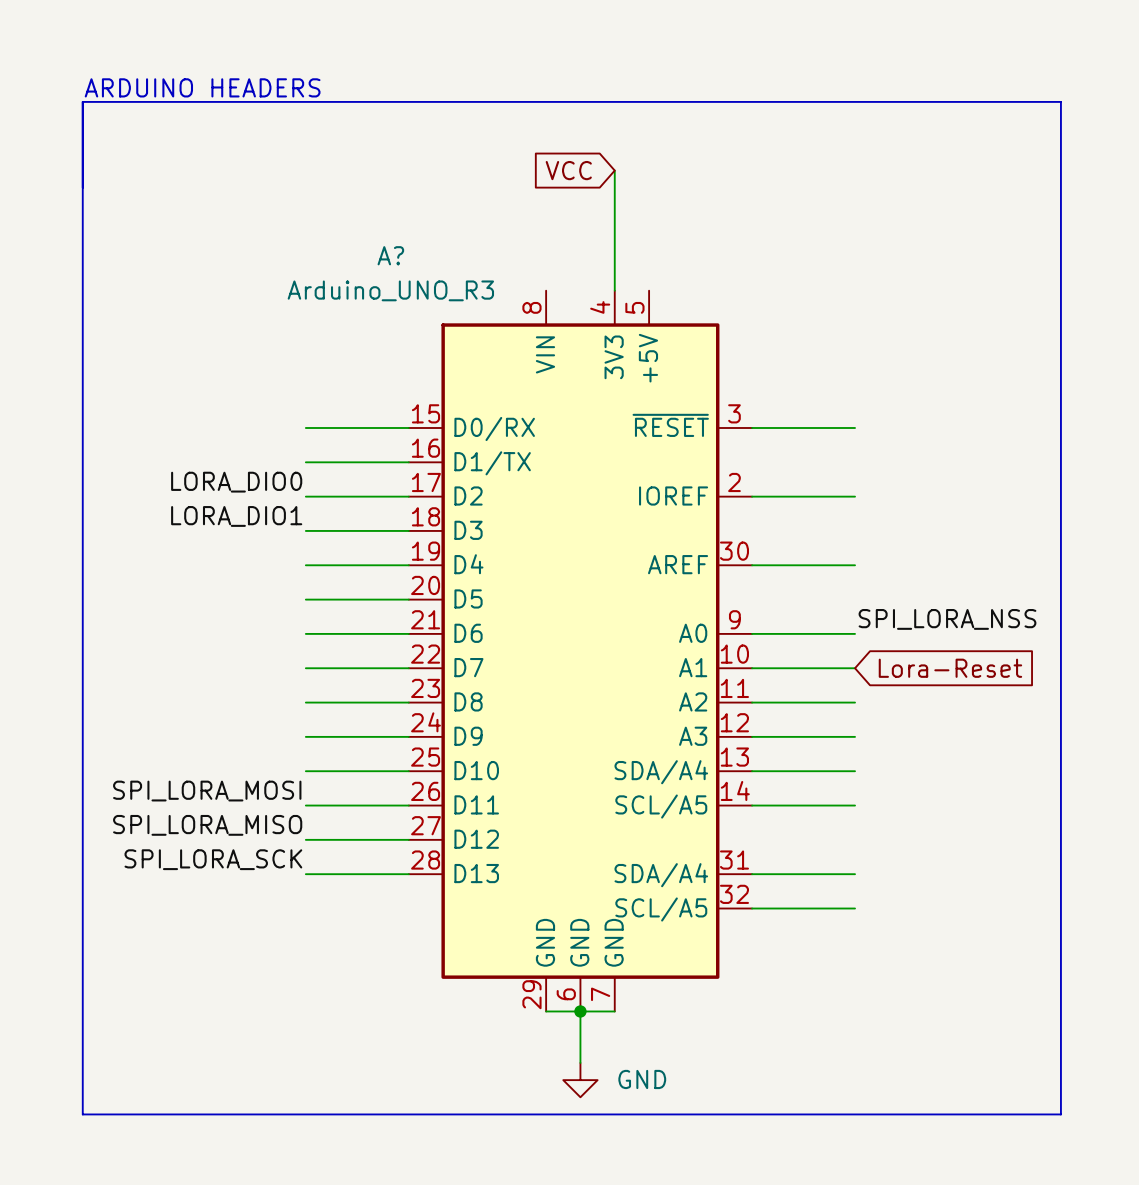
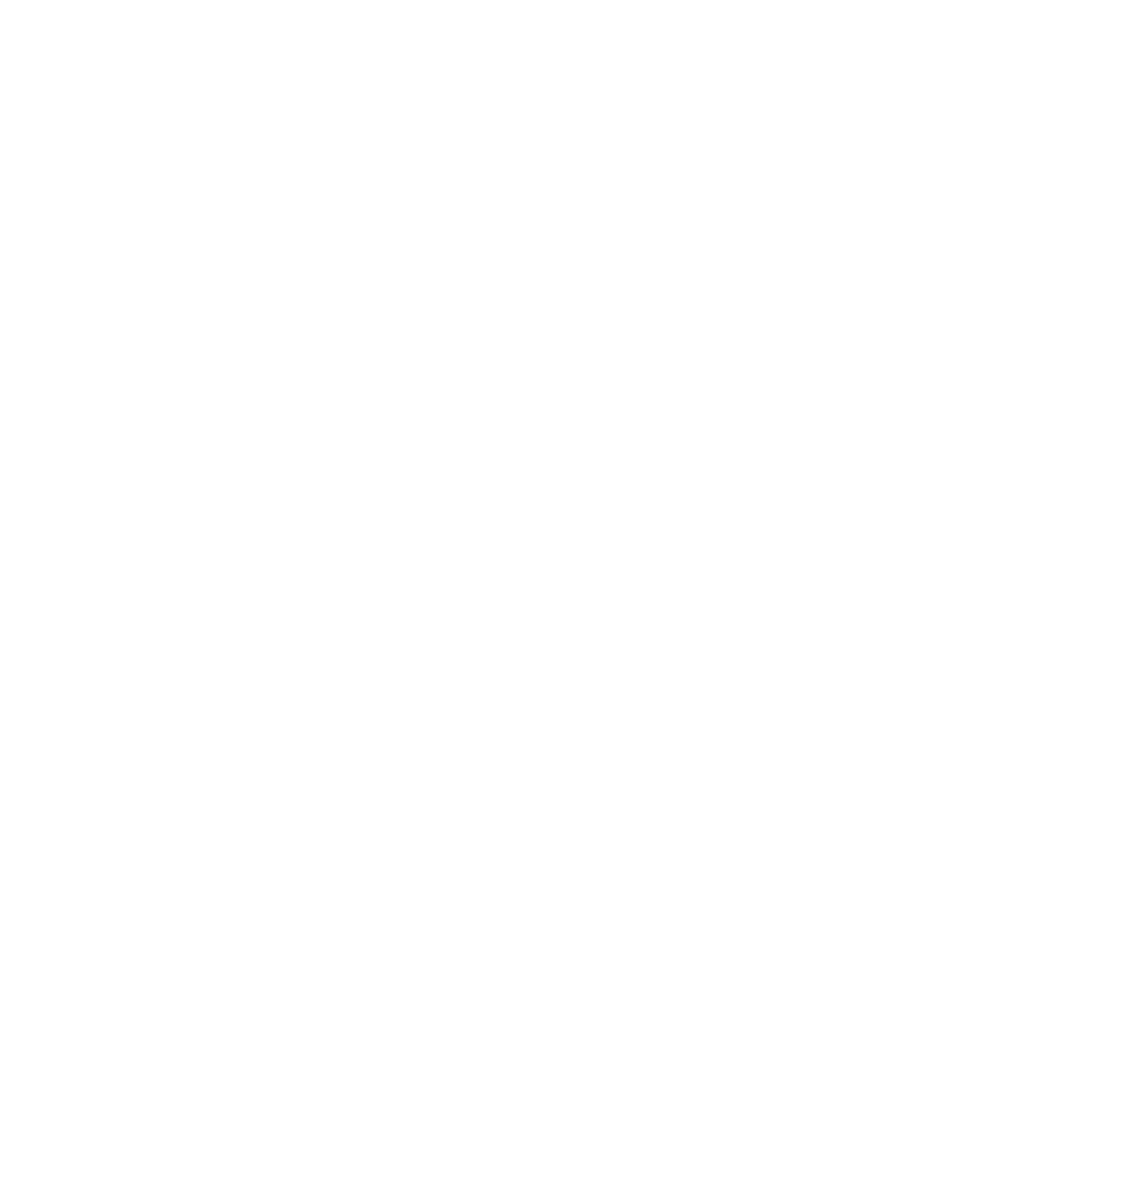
text: ARDUINO HEADERS (202, 87) -> none
line: (82, 101) (82, 1114) (1060, 1114) (1060, 101) (82, 101) -> none
global label: VCC (568, 170) -> none
wire: (614, 170) (614, 290) -> none
wire: (305, 427) (408, 427) -> none
wire: (752, 427) (855, 427) -> none
wire: (305, 462) (408, 462) -> none
label: LORA_DIO0 (236, 482) -> none
wire: (305, 496) (408, 496) -> none
wire: (752, 496) (855, 496) -> none
label: LORA_DIO1 (236, 516) -> none
wire: (305, 530) (408, 530) -> none
wire: (305, 565) (408, 565) -> none
wire: (752, 565) (855, 565) -> none
wire: (305, 599) (408, 599) -> none
label: SPI_LORA_NSS (947, 619) -> none
wire: (305, 633) (408, 633) -> none
wire: (752, 633) (855, 633) -> none
A?: Arduino_UNO_R3 (580, 651) -> none
wire: (305, 668) (408, 668) -> none
wire: (752, 668) (855, 668) -> none
global label: Lora-Reset (950, 668) -> none
wire: (305, 702) (408, 702) -> none
wire: (752, 702) (855, 702) -> none
wire: (305, 736) (408, 736) -> none
wire: (752, 736) (855, 736) -> none
wire: (305, 771) (408, 771) -> none
wire: (752, 771) (855, 771) -> none
label: SPI_LORA_MOSI (207, 791) -> none
wire: (305, 805) (408, 805) -> none
wire: (752, 805) (855, 805) -> none
label: SPI_LORA_MISO (207, 825) -> none
wire: (305, 839) (408, 839) -> none
label: SPI_LORA_SCK (213, 859) -> none
wire: (305, 874) (408, 874) -> none
wire: (752, 874) (855, 874) -> none
wire: (752, 908) (855, 908) -> none
wire: (546, 1011) (614, 1011) -> none
wire: (580, 1011) (580, 1062) -> none
junction: (580, 1011) -> none
power symbol: GND (580, 1080) -> none

